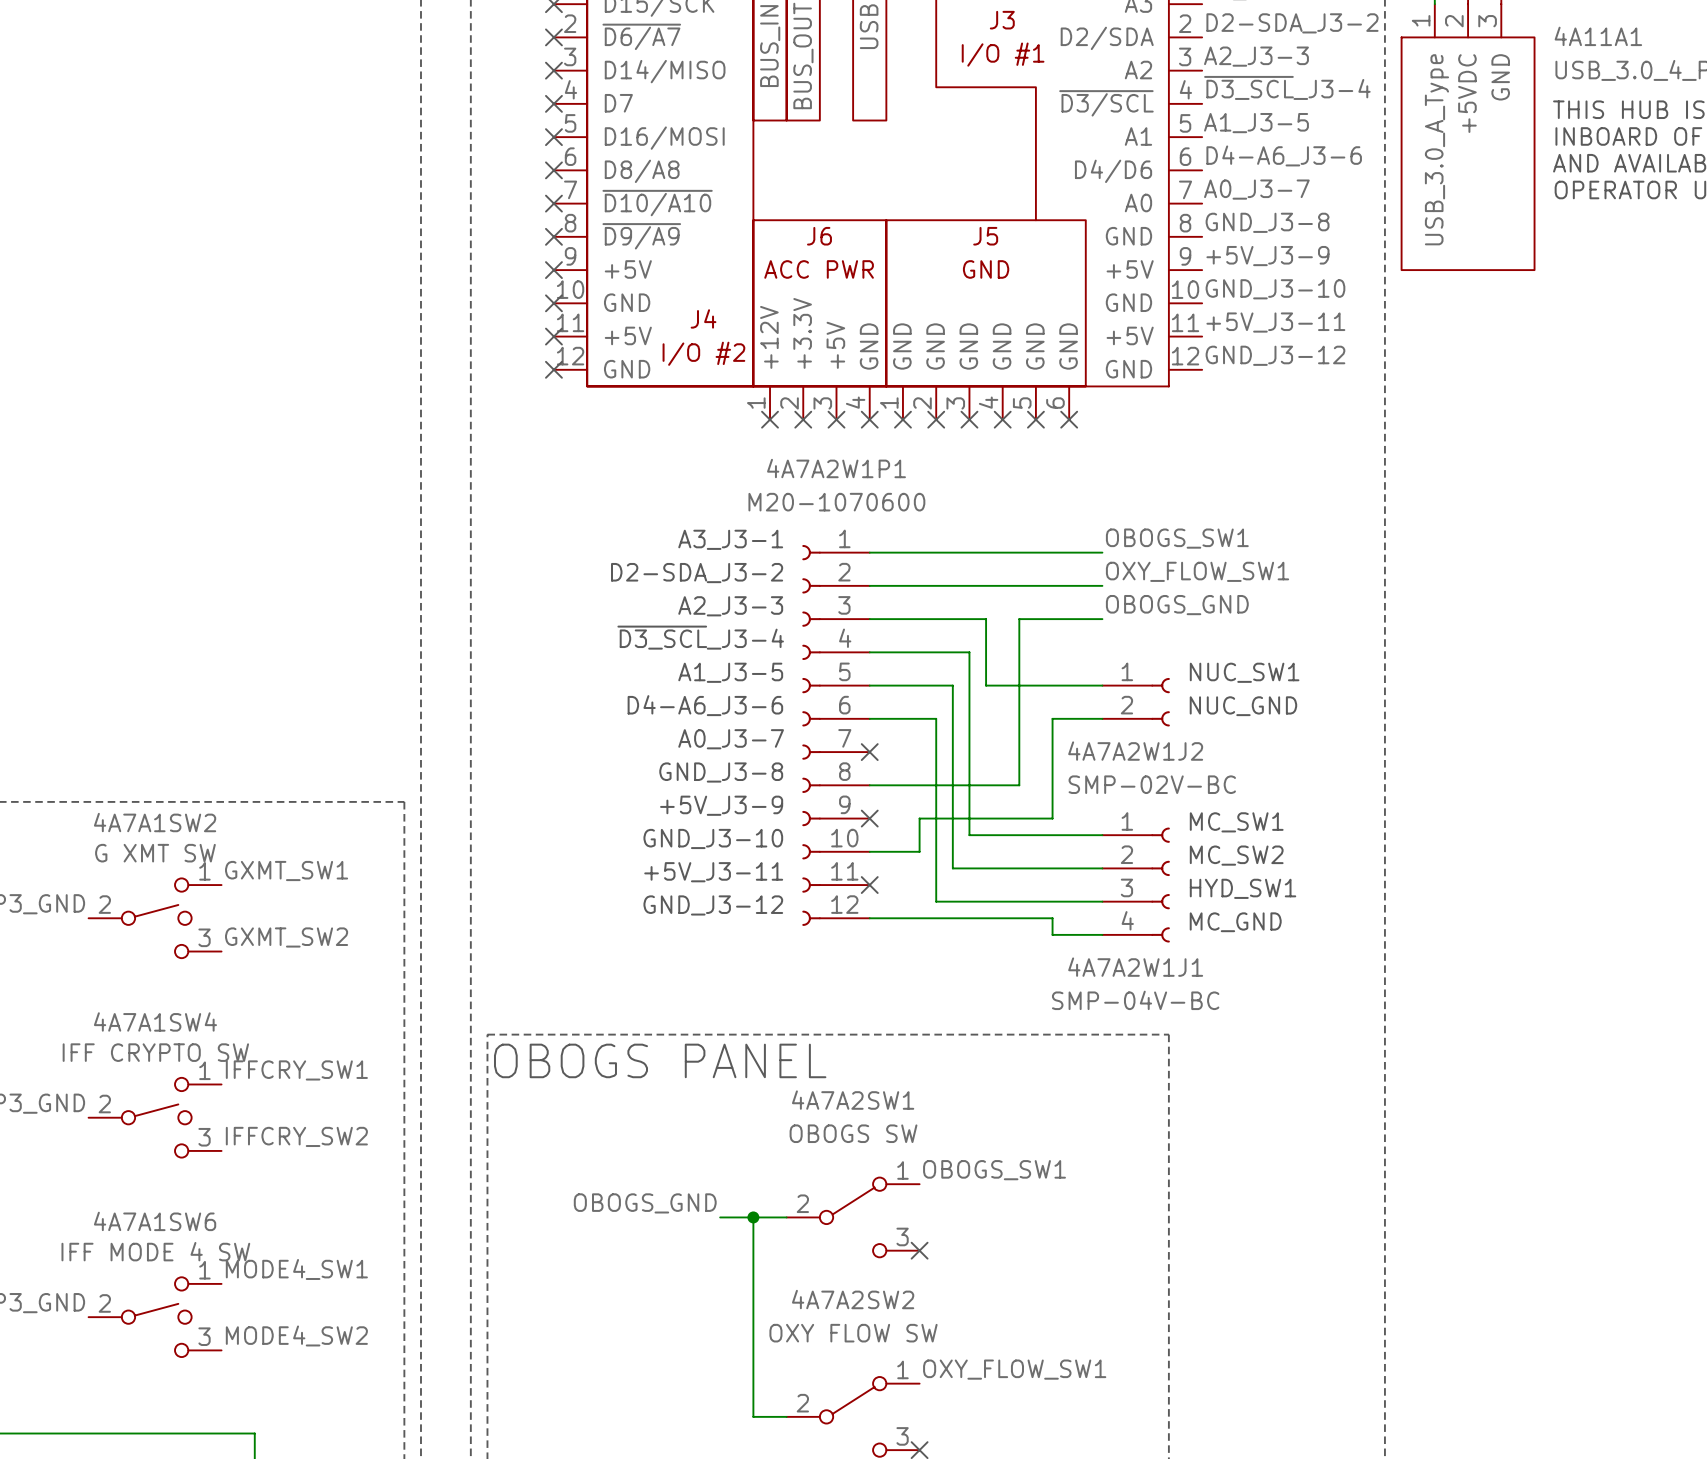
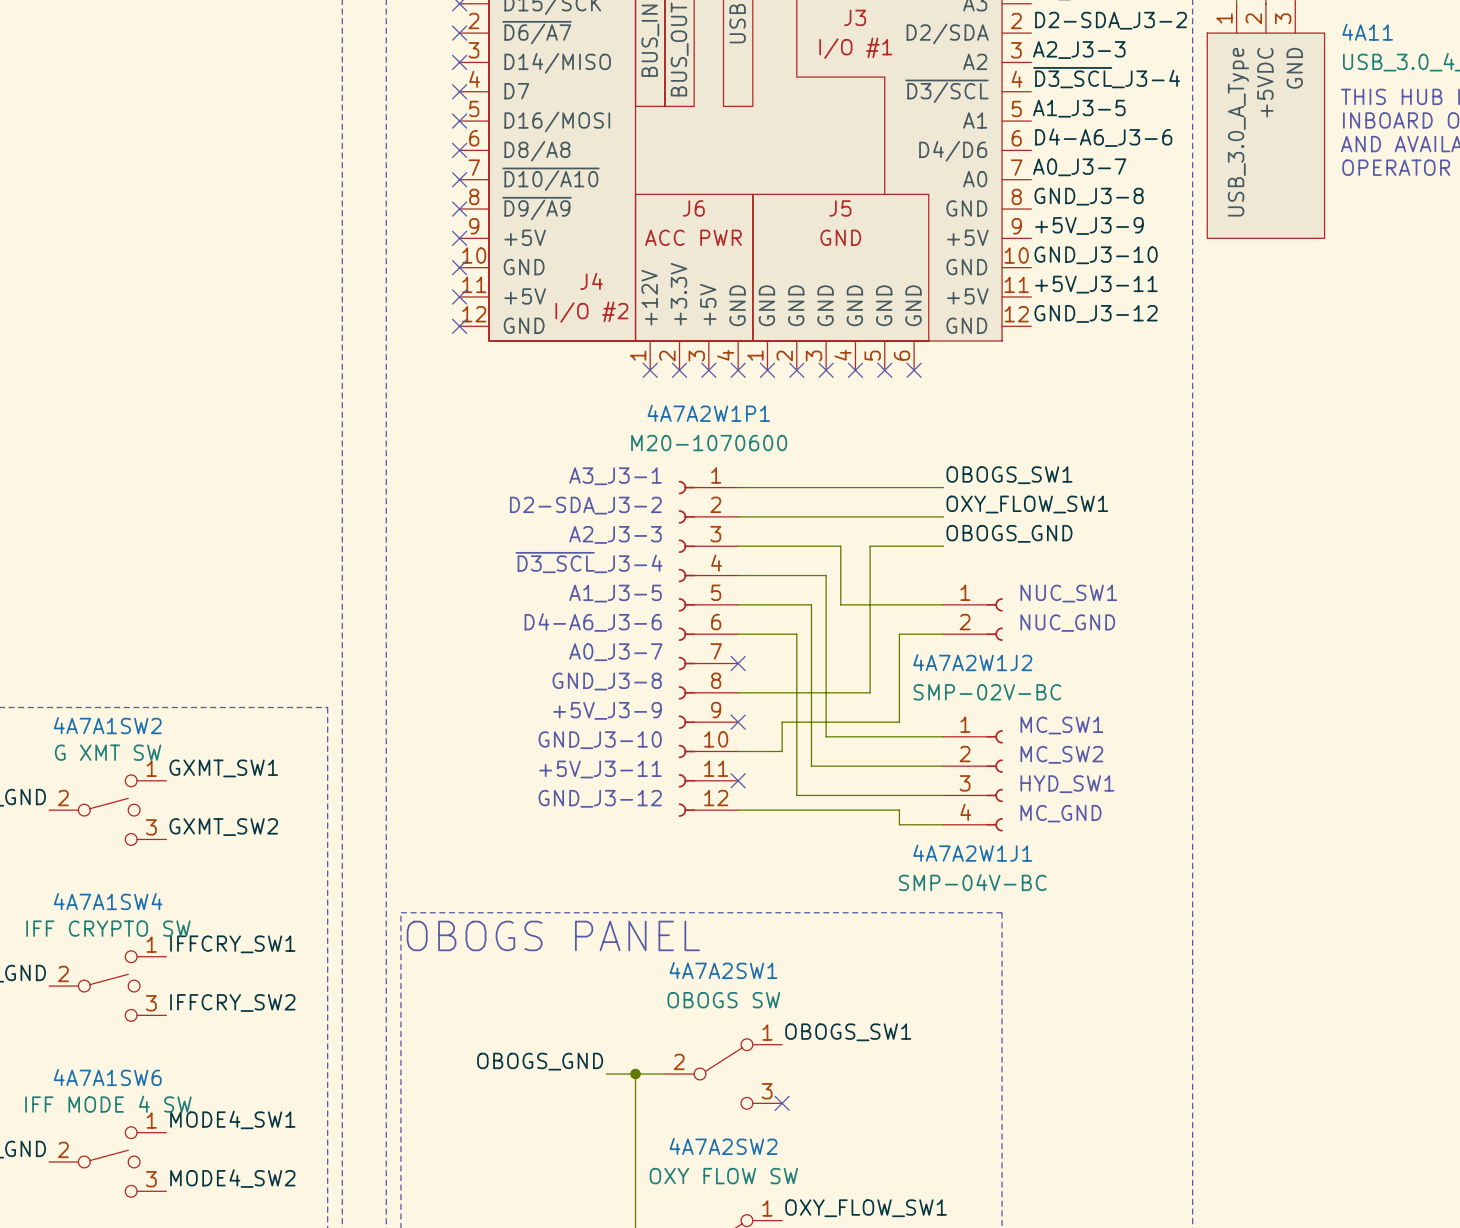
4A11A1 name: 4A11A1 (1598, 36) -> 4A11 (1367, 32)

